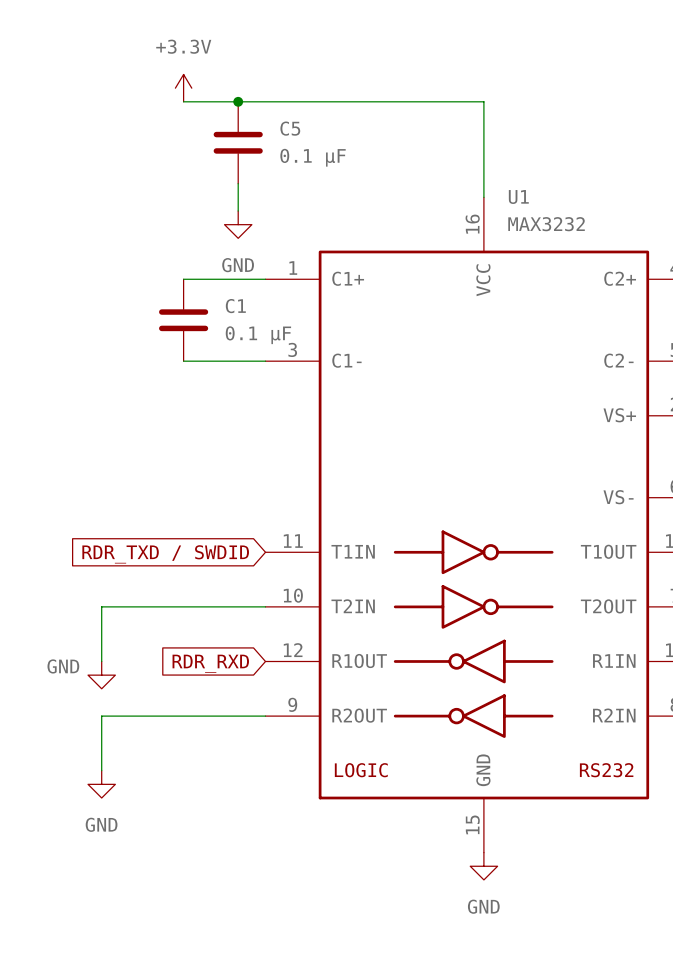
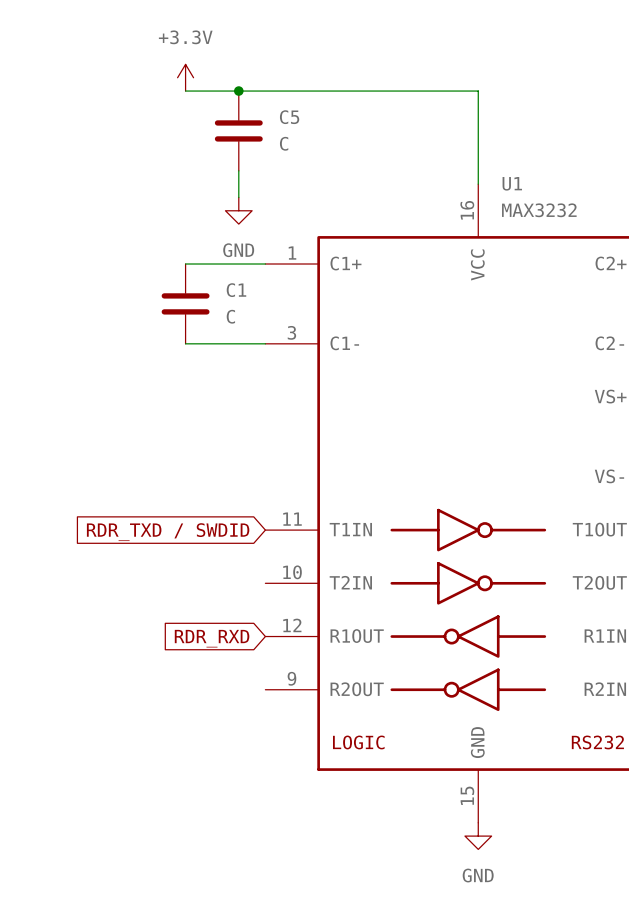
C5 value: 0.1 µF (313, 157) -> C (284, 143)
C1 value: 0.1 µF (258, 335) -> C (230, 316)
wire: (265, 606) (101, 606) (101, 661) -> none
power symbol: GND (101, 675) -> none
wire: (265, 716) (101, 716) (101, 770) -> none
power symbol: GND (101, 784) -> none

